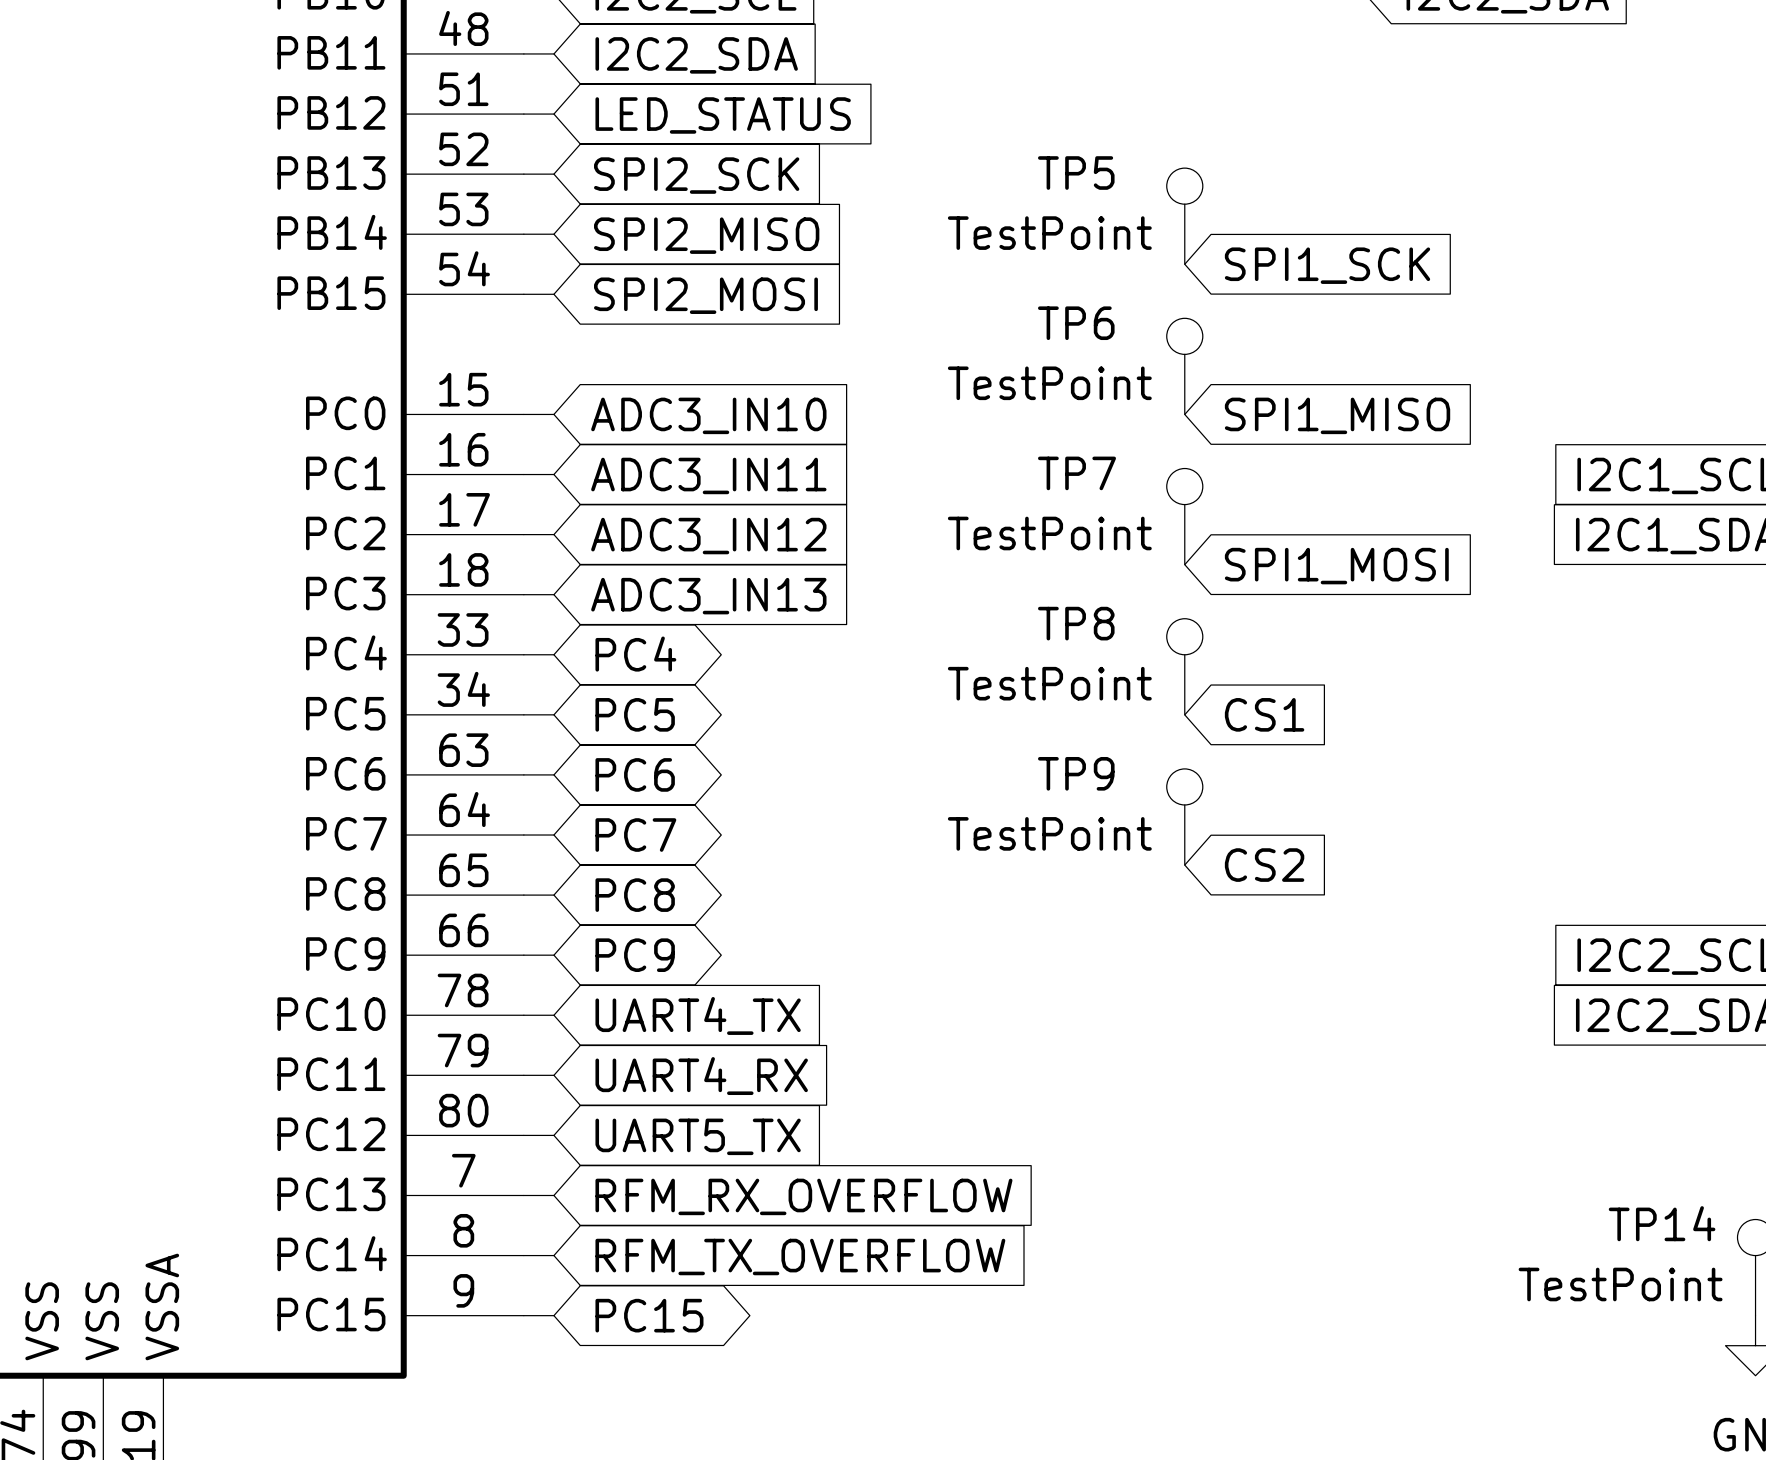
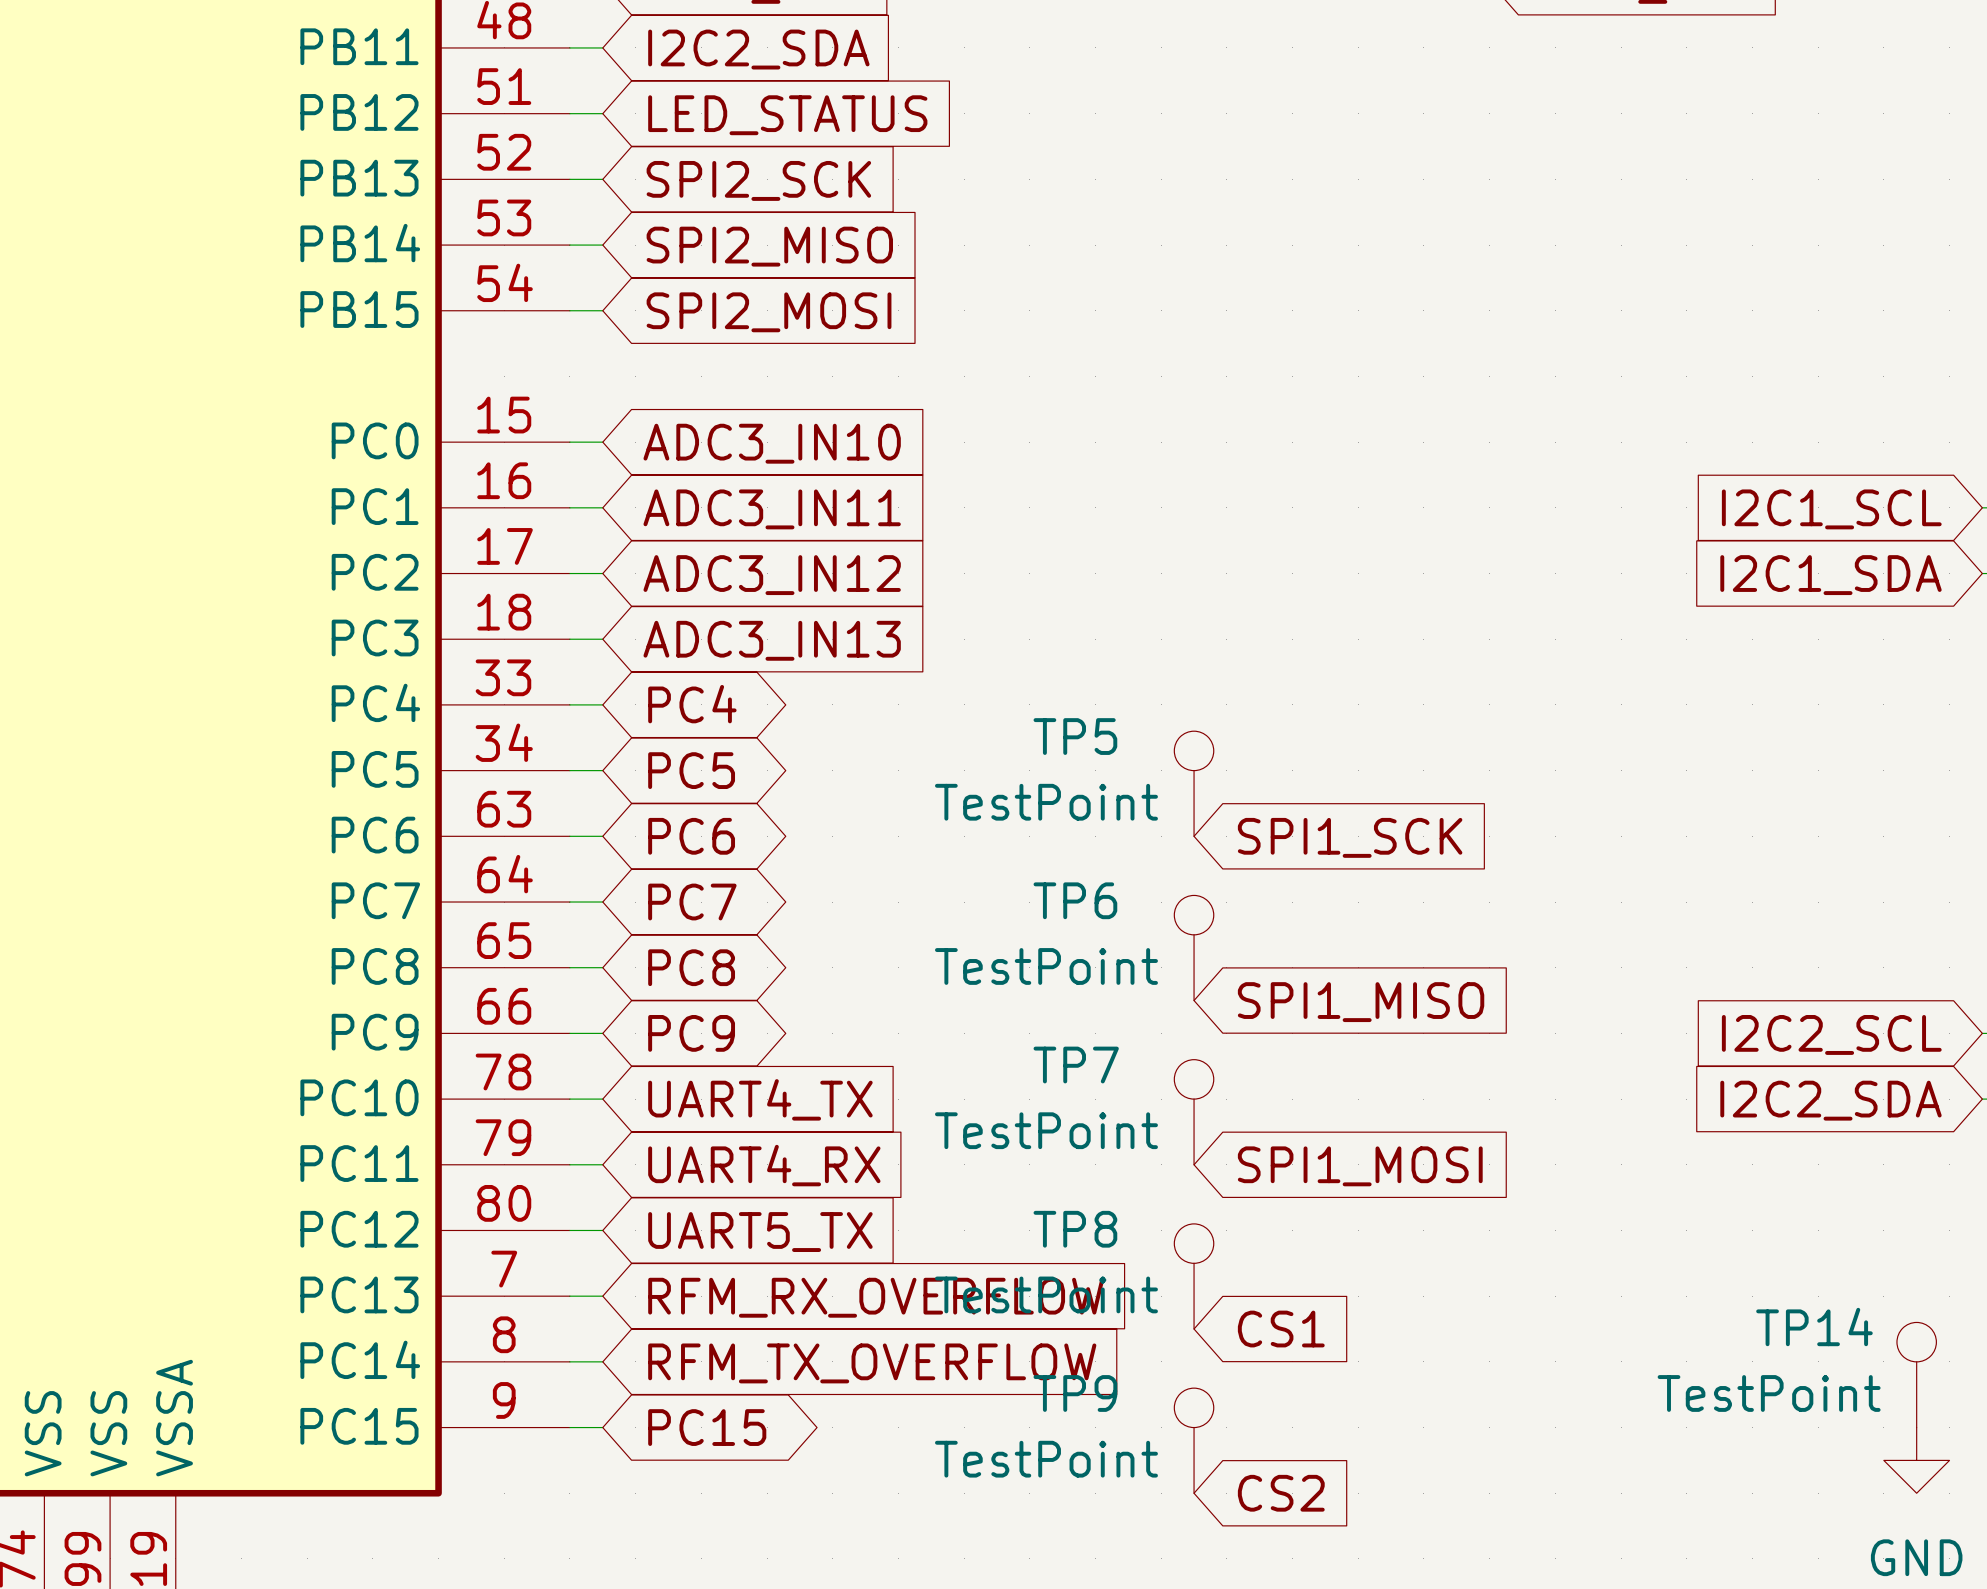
TP5 position: (1184, 216) -> (1194, 783)
global label position: SPI1_SCK (1327, 265) -> SPI1_SCK (1350, 837)
TP6 position: (1184, 366) -> (1194, 947)
global label position: SPI1_MISO (1337, 415) -> SPI1_MISO (1361, 1002)
TP7 position: (1184, 516) -> (1194, 1112)
global label position: SPI1_MOSI (1336, 566) -> SPI1_MOSI (1360, 1166)
TP8 position: (1184, 666) -> (1194, 1276)
global label position: CS1 (1264, 714) -> CS1 (1281, 1329)
TP9 position: (1184, 816) -> (1194, 1440)
global label position: CS2 (1264, 865) -> CS2 (1281, 1493)

